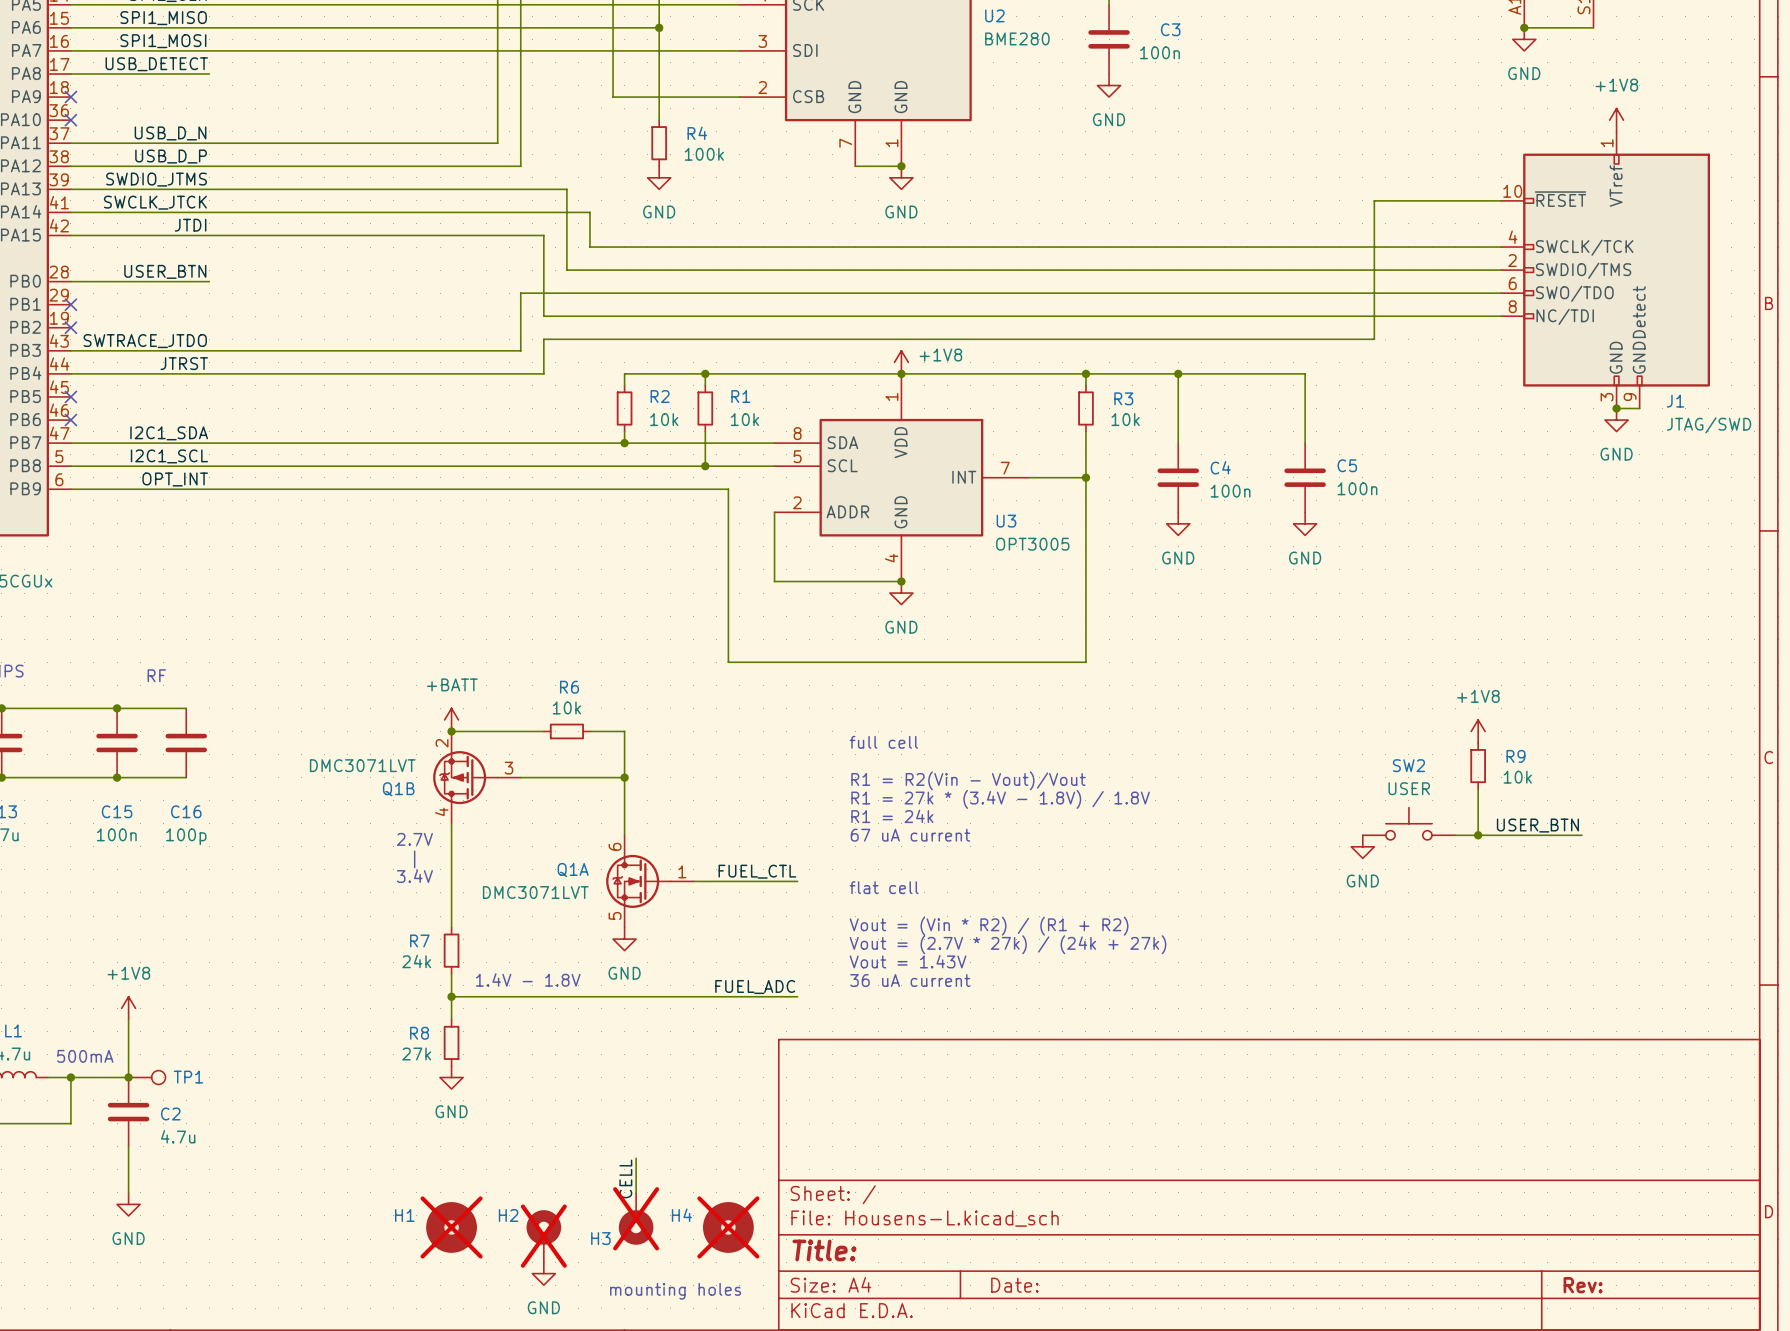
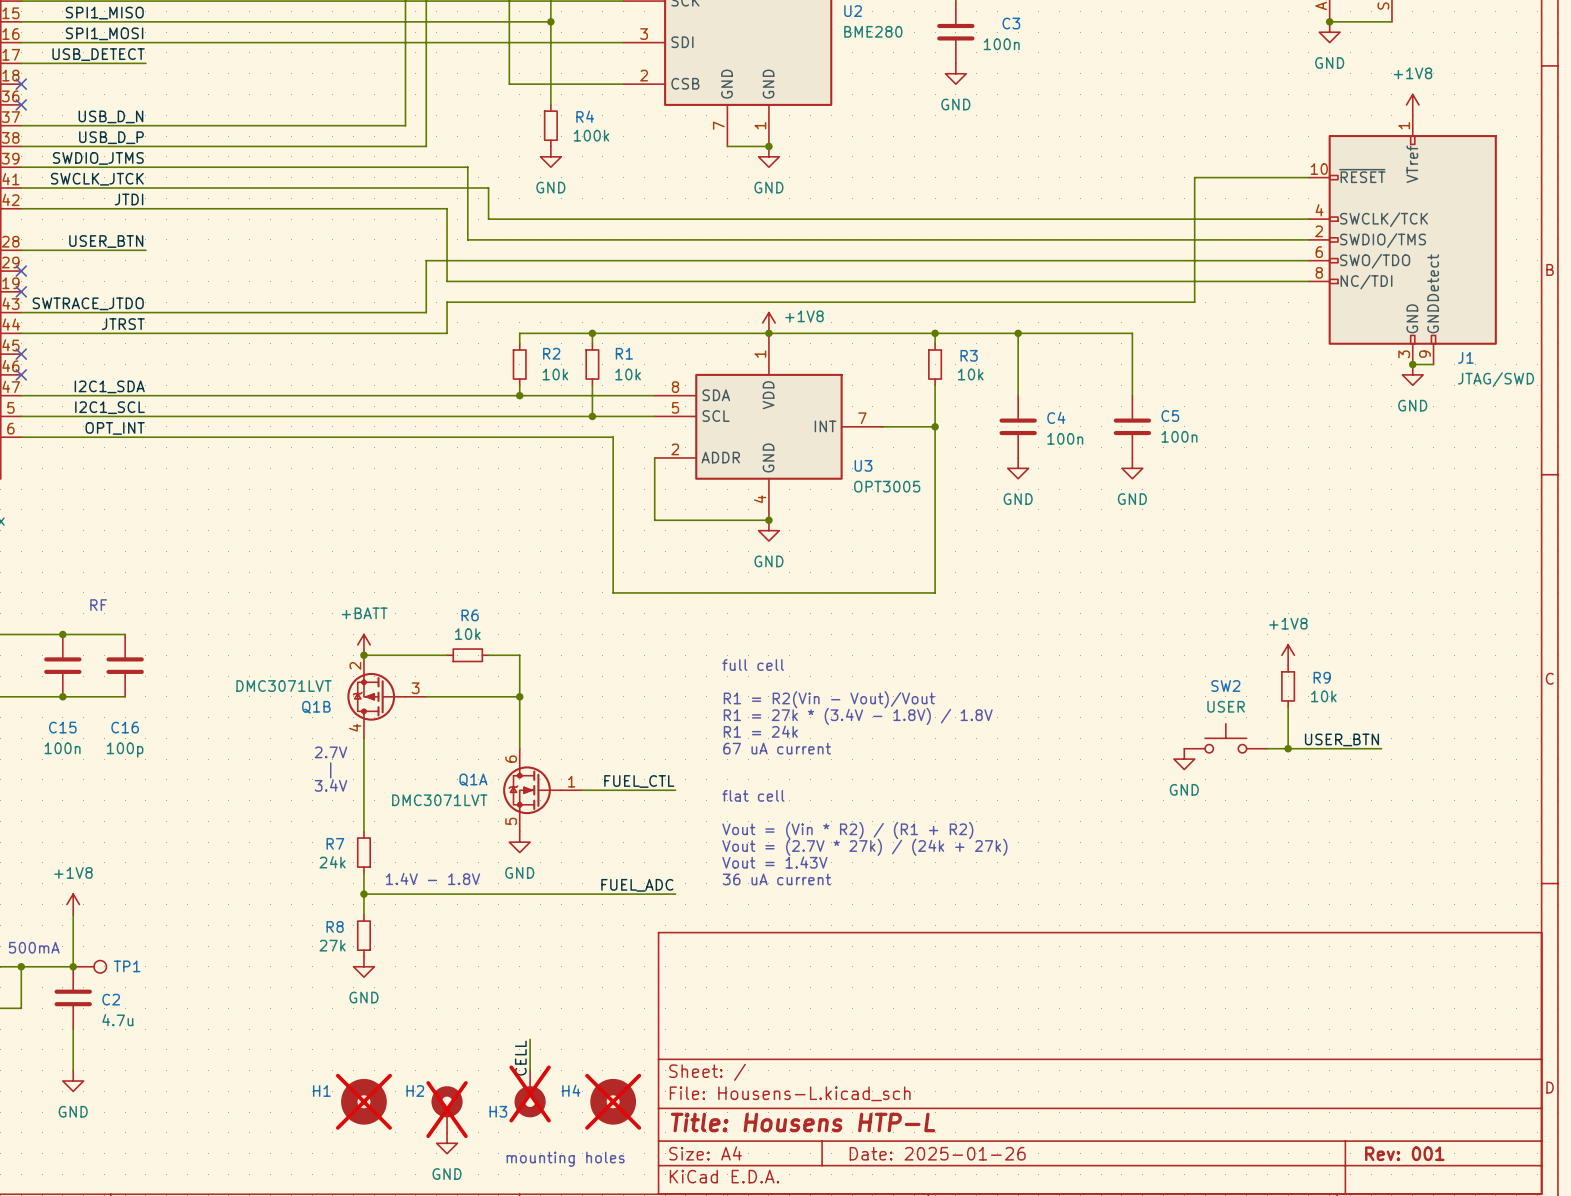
title block: Title: (824, 1250) -> Title: Housens HTP-L (803, 1122)
title block: Date: (1014, 1285) -> Date: 2025-01-26 (937, 1153)
title block: Rev: (1583, 1285) -> Rev: 001 (1404, 1153)

